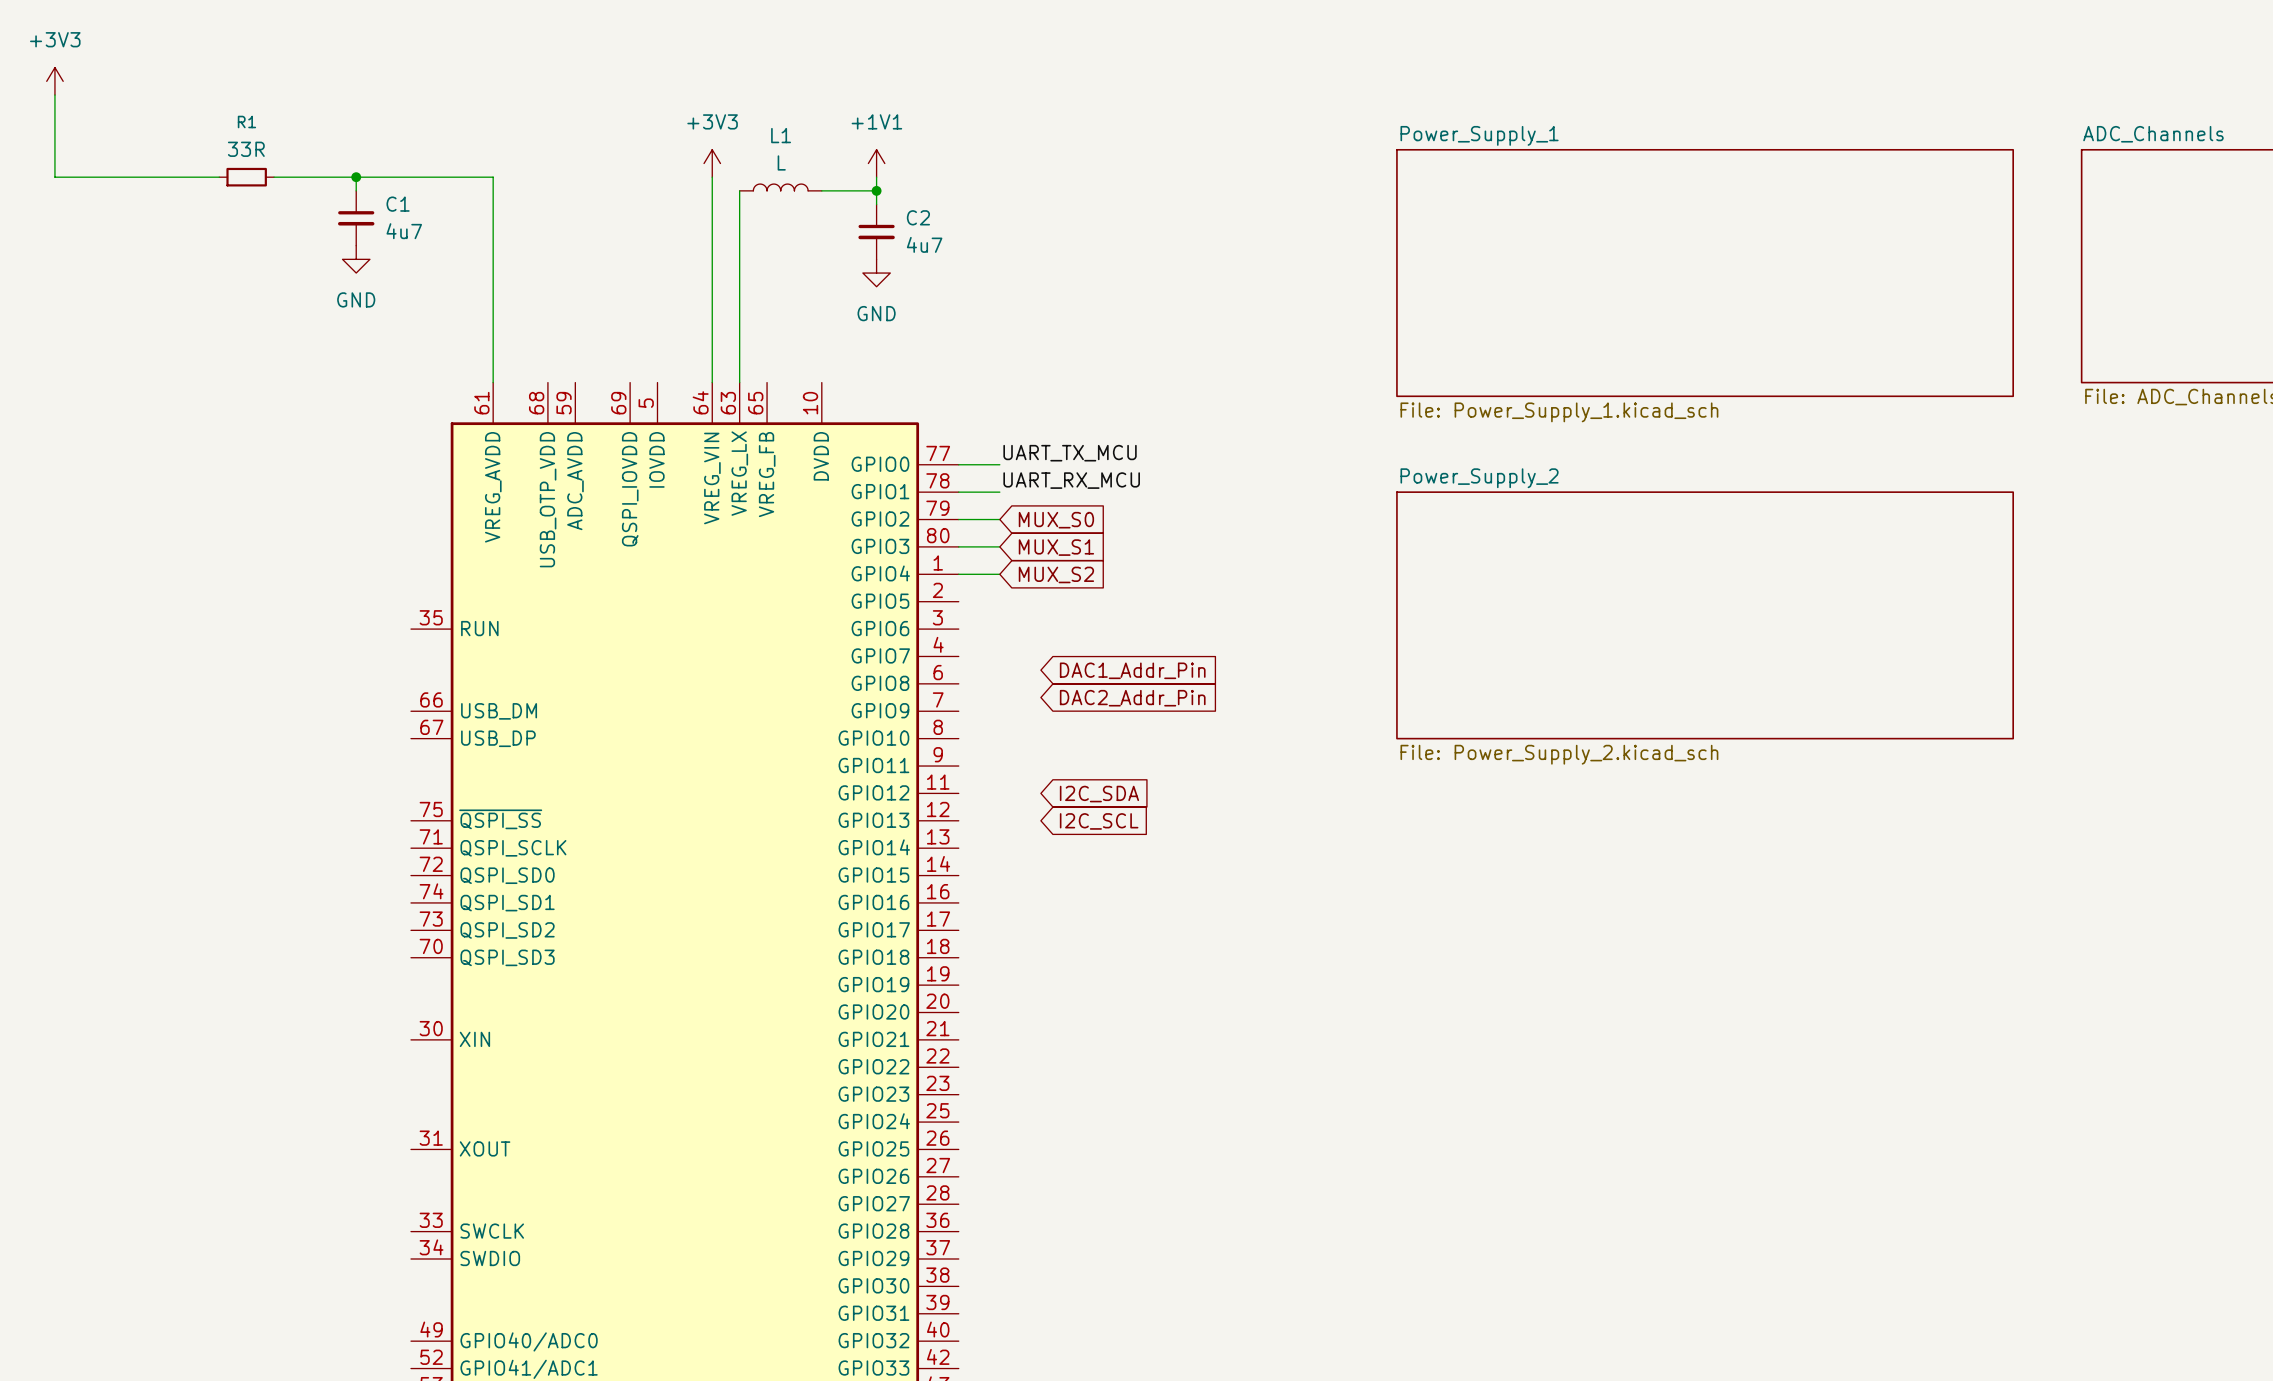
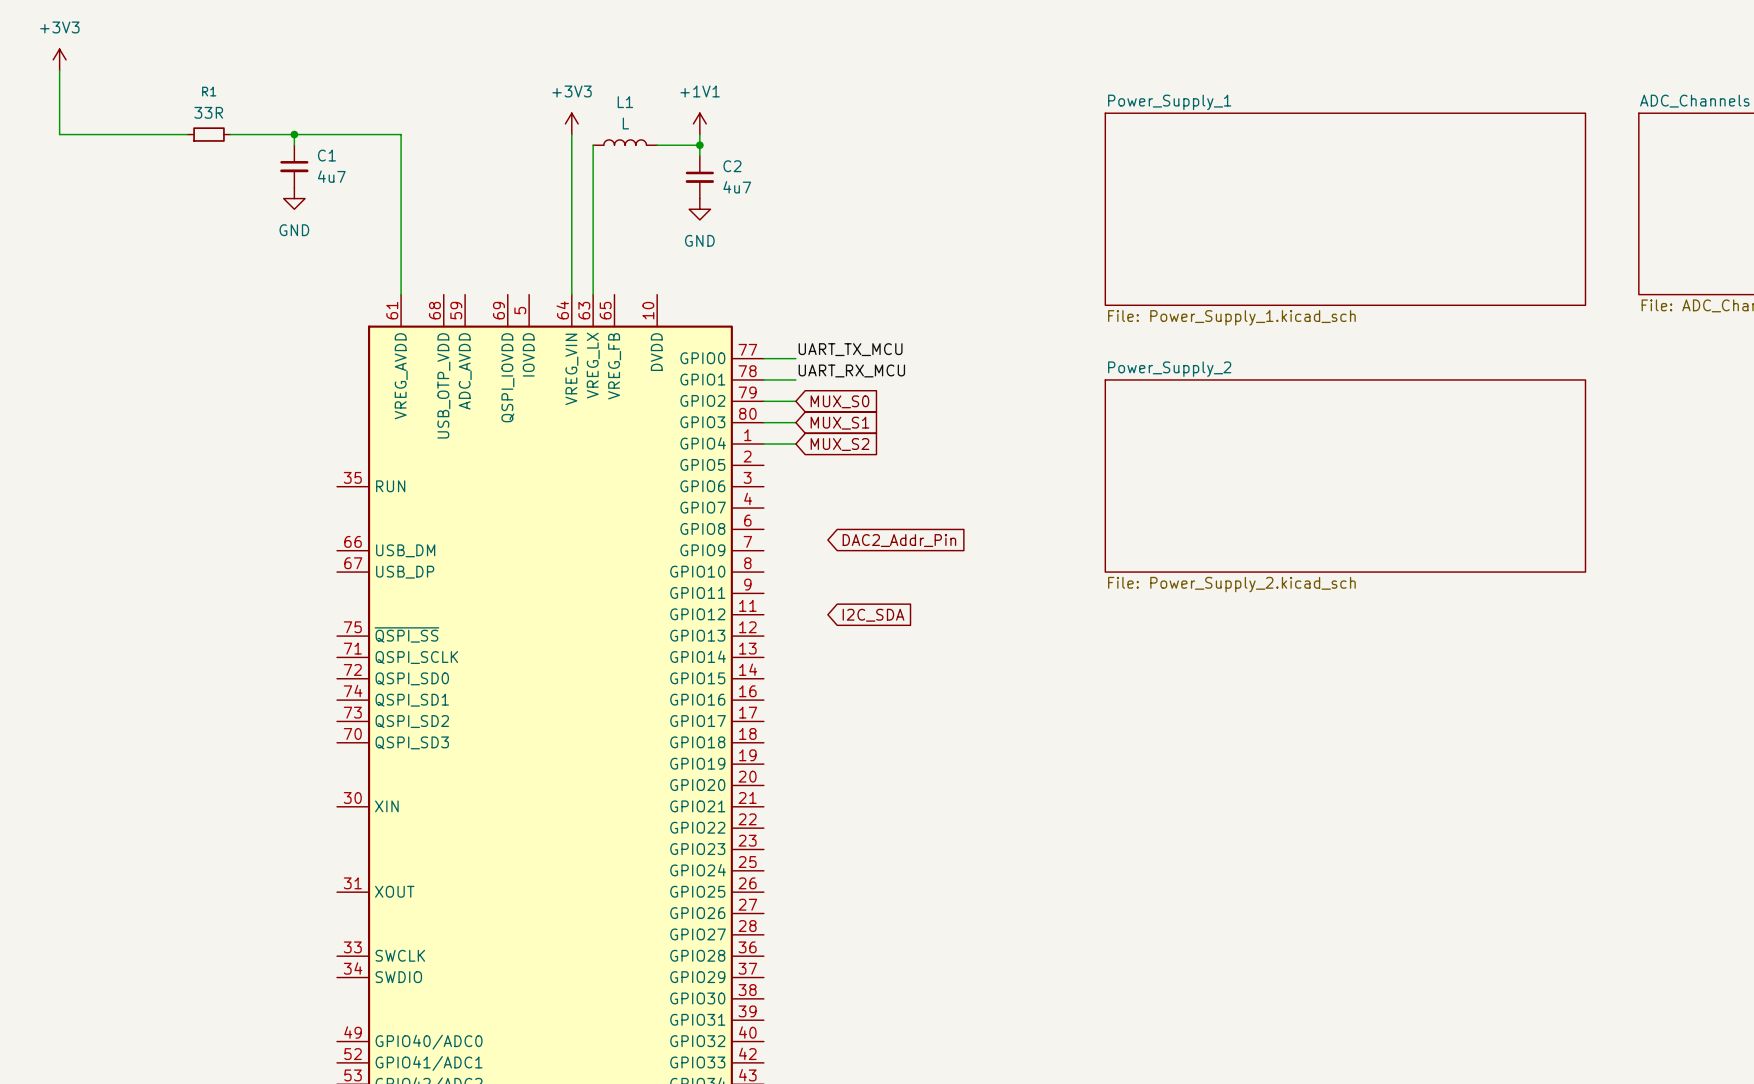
global label: DAC1_Addr_Pin (1132, 670) -> none
global label: I2C_SCL (1099, 821) -> none

